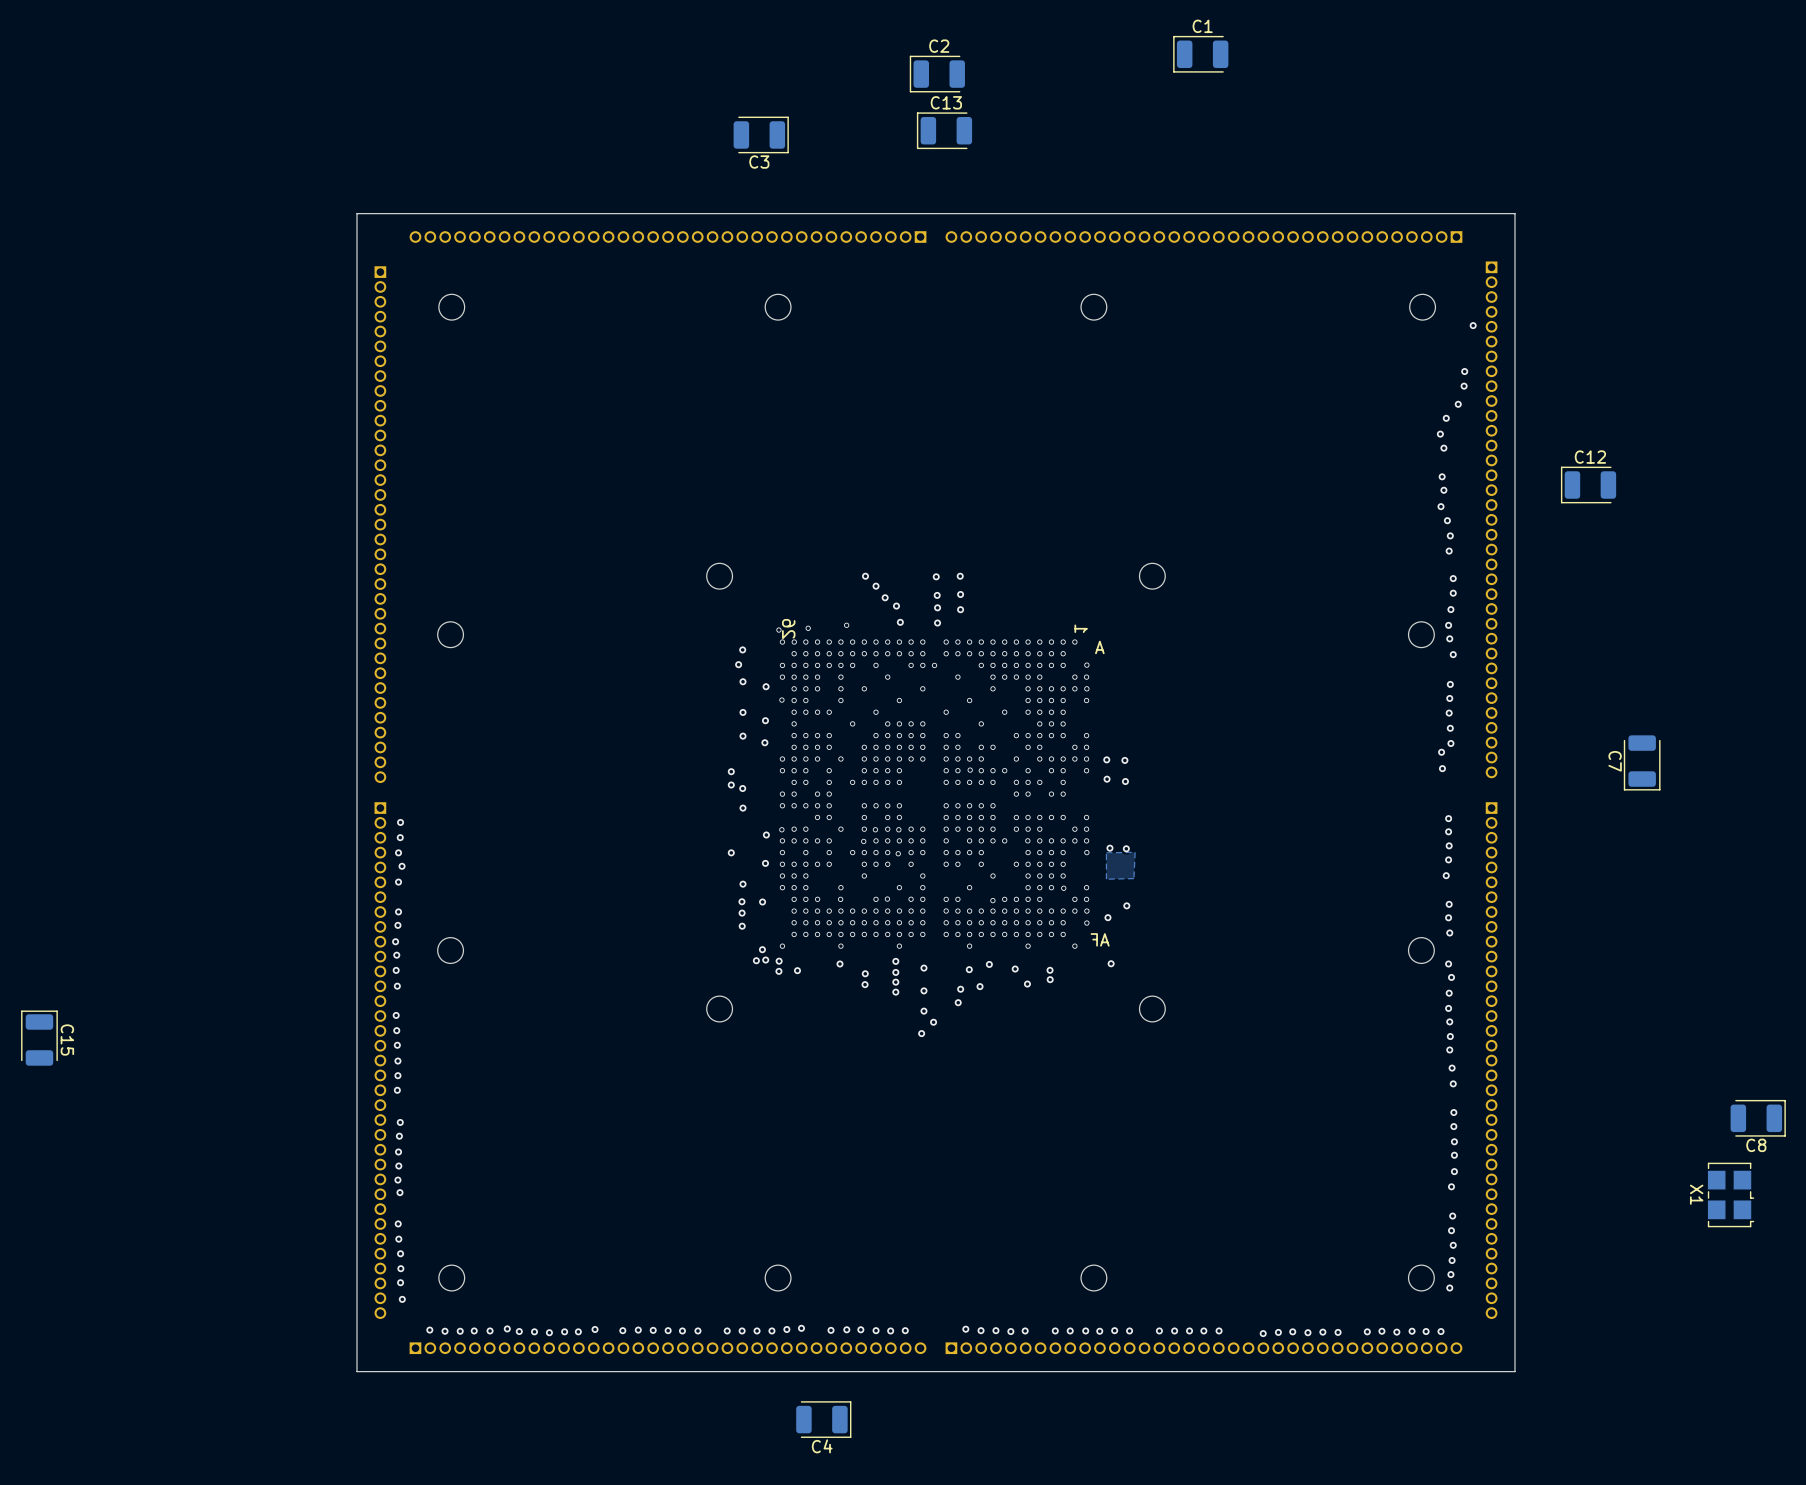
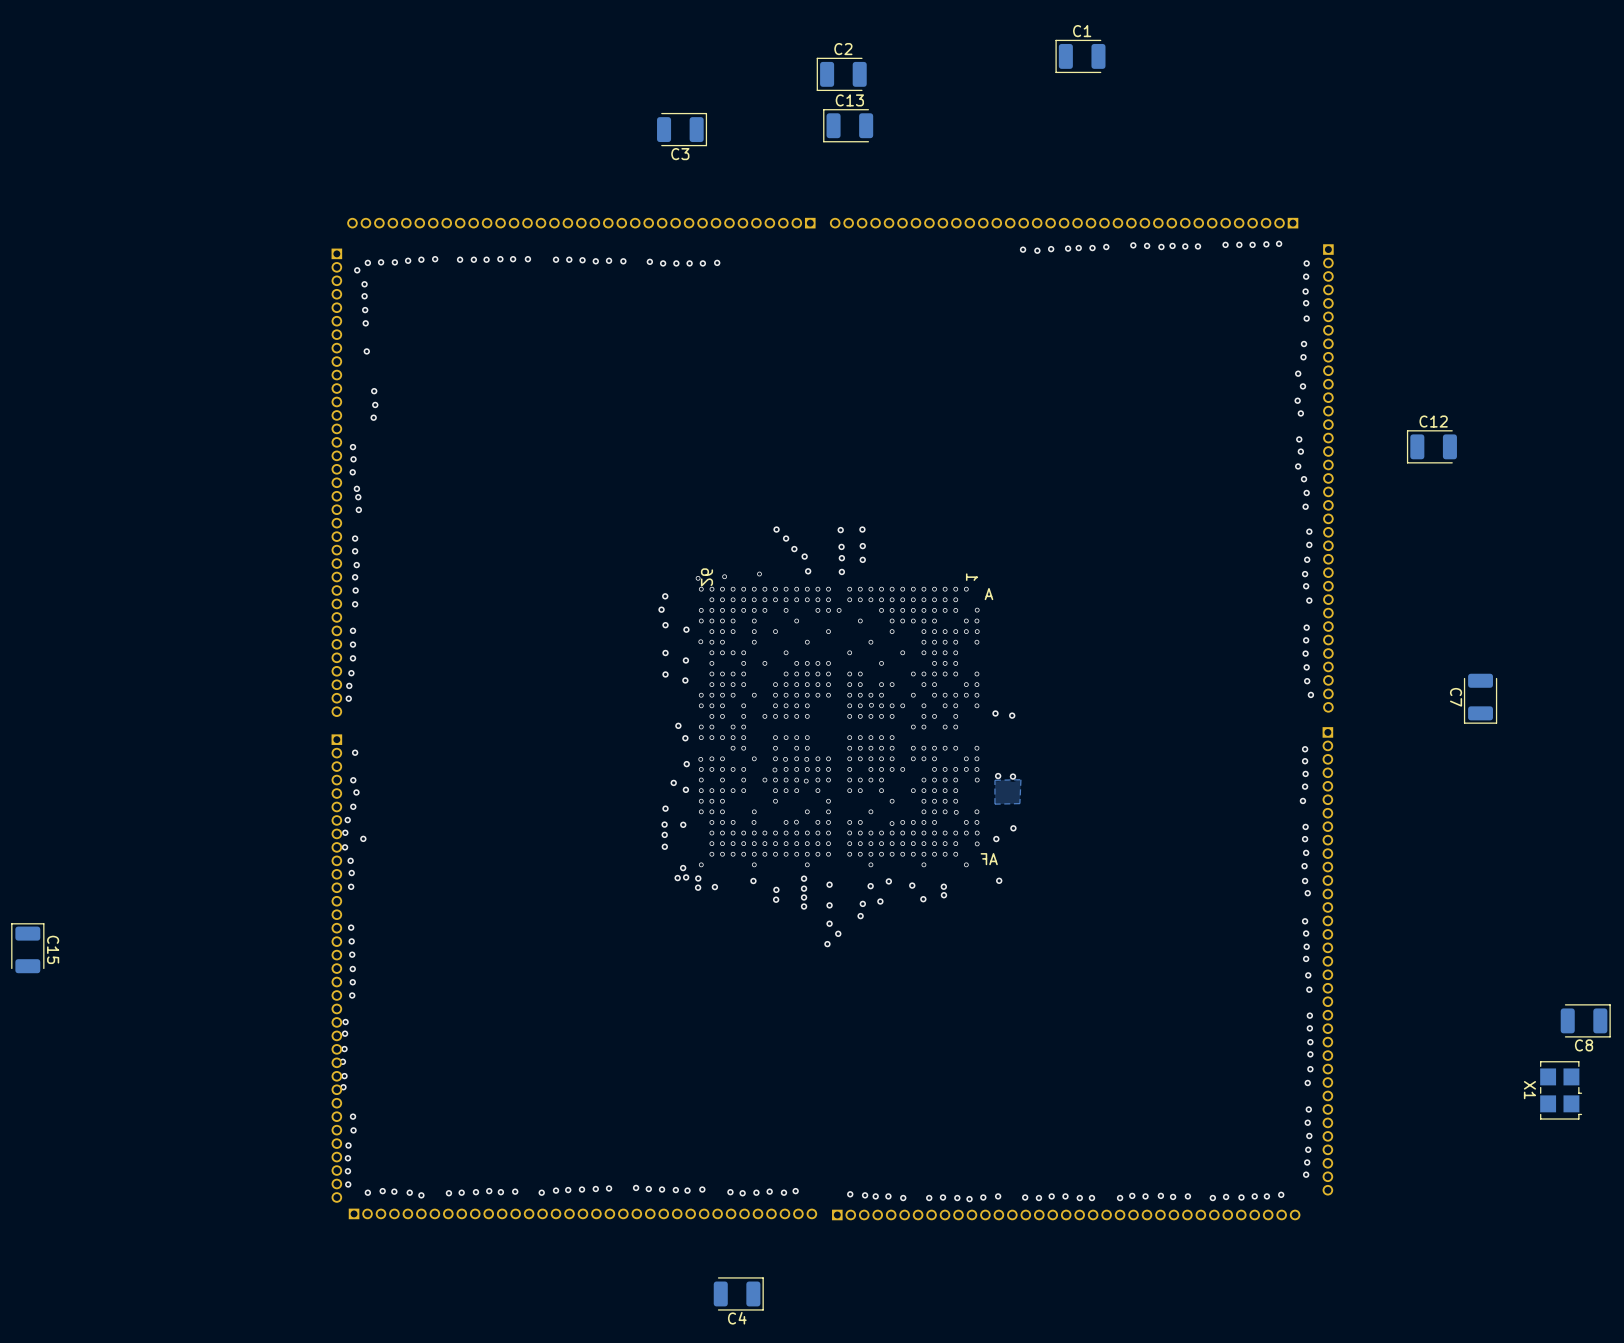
board edge: (1514, 213) (357, 213) (357, 1371) (1514, 1371) (1514, 213) -> none
part position: (668, 237) -> (581, 223)
part position: (1203, 237) -> (1064, 223)
via: none -> (1266, 244)
via: none -> (1279, 243)
via: none -> (1133, 245)
via: none -> (1225, 244)
via: none -> (1239, 244)
via: none -> (1252, 244)
via: none -> (1147, 245)
via: none -> (1172, 245)
via: none -> (1185, 246)
via: none -> (1198, 246)
via: none -> (1106, 246)
via: none -> (1161, 246)
via: none -> (1078, 248)
via: none -> (1092, 248)
via: none -> (1051, 249)
via: none -> (1068, 248)
via: none -> (1023, 249)
via: none -> (1037, 250)
via: none -> (435, 259)
via: none -> (500, 259)
via: none -> (513, 259)
via: none -> (527, 259)
via: none -> (421, 259)
via: none -> (460, 259)
via: none -> (473, 259)
via: none -> (486, 259)
via: none -> (556, 259)
via: none -> (569, 259)
via: none -> (408, 260)
via: none -> (582, 260)
via: none -> (609, 260)
via: none -> (595, 261)
via: none -> (623, 261)
via: none -> (649, 261)
via: none -> (381, 262)
via: none -> (394, 262)
via: none -> (367, 262)
via: none -> (663, 263)
via: none -> (676, 263)
via: none -> (689, 263)
via: none -> (702, 263)
via: none -> (717, 262)
via: none -> (1306, 263)
via: none -> (357, 270)
round board edge: [438, 294, 465, 321] -> none
round board edge: [764, 294, 792, 321] -> none
round board edge: [1080, 294, 1108, 321] -> none
round board edge: [1409, 294, 1436, 321] -> none
via: none -> (1306, 276)
via: none -> (364, 284)
via: none -> (1305, 291)
via: none -> (364, 296)
via: (1473, 325) -> none
via: none -> (1306, 303)
via: none -> (365, 310)
via: none -> (1306, 318)
via: none -> (365, 323)
via: none -> (1304, 344)
via: (1464, 371) -> none
via: none -> (366, 351)
via: none -> (1303, 357)
via: (1464, 386) -> none
via: none -> (1298, 373)
via: (1458, 404) -> none
via: none -> (374, 391)
via: none -> (375, 404)
via: none -> (373, 417)
via: none -> (353, 447)
via: none -> (353, 459)
via: none -> (352, 472)
part position: (1491, 519) -> (1328, 478)
via: none -> (356, 488)
via: none -> (358, 497)
via: none -> (358, 509)
round board edge: [706, 563, 733, 590] -> none
round board edge: [1139, 563, 1166, 590] -> none
via: none -> (355, 538)
via: none -> (355, 551)
via: none -> (356, 565)
round board edge: [437, 621, 464, 648] -> none
round board edge: [1408, 621, 1435, 648] -> none
via: none -> (355, 577)
via: none -> (355, 590)
via: none -> (355, 604)
via: none -> (353, 630)
via: none -> (353, 644)
via: none -> (353, 658)
via: none -> (743, 663)
via: none -> (351, 673)
via: none -> (349, 685)
via: (1441, 752) -> none
via: none -> (1310, 694)
via: (1106, 759) -> none
via: (1124, 760) -> none
via: none -> (348, 698)
via: (1442, 768) -> none
via: (731, 771) -> none
via: (1016, 782) -> none
via: (731, 785) -> none
via: (742, 788) -> none
via: none -> (678, 725)
via: none -> (685, 738)
via: (742, 808) -> none
via: (400, 837) -> none
via: (1027, 840) -> none
via position: (731, 852) -> (673, 782)
via: none -> (347, 820)
via: none -> (345, 832)
via: (398, 911) -> none
via: none -> (363, 838)
via: (397, 925) -> none
via: none -> (345, 847)
round board edge: [437, 937, 464, 964] -> none
round board edge: [1408, 937, 1435, 964] -> none
via: (397, 986) -> none
via position: (1449, 993) -> (1304, 866)
round board edge: [706, 995, 733, 1023] -> none
round board edge: [1139, 995, 1166, 1023] -> none
part position: (1491, 1060) -> (1327, 961)
via: none -> (345, 1022)
via: (400, 1122) -> none
via: none -> (345, 1033)
via: (399, 1136) -> none
via: none -> (344, 1049)
via: (398, 1151) -> none
via: none -> (342, 1061)
via: (398, 1166) -> none
via: none -> (344, 1076)
via: (397, 1180) -> none
via: none -> (343, 1087)
via: (399, 1192) -> none
via: (400, 1253) -> none
via: none -> (348, 1145)
round board edge: [438, 1264, 465, 1292] -> none
round board edge: [764, 1264, 792, 1292] -> none
round board edge: [1080, 1264, 1108, 1292] -> none
round board edge: [1408, 1264, 1435, 1292] -> none
via: (400, 1268) -> none
via: none -> (347, 1158)
via: (400, 1282) -> none
via: none -> (347, 1171)
via: none -> (348, 1184)
via: (402, 1299) -> none
via: none -> (636, 1187)
via: none -> (595, 1189)
via: none -> (609, 1188)
via: none -> (648, 1189)
via: none -> (568, 1190)
via: none -> (582, 1189)
via: none -> (662, 1189)
via: none -> (675, 1190)
via: none -> (702, 1189)
via: none -> (556, 1190)
via: none -> (687, 1190)
via: none -> (382, 1191)
via: none -> (394, 1191)
via: none -> (489, 1191)
via: none -> (515, 1191)
via: none -> (769, 1191)
via: none -> (795, 1191)
via: none -> (367, 1192)
via: none -> (409, 1192)
via: none -> (461, 1192)
via: none -> (475, 1192)
via: none -> (500, 1192)
via: none -> (541, 1192)
via: none -> (730, 1192)
via: none -> (756, 1192)
via: none -> (783, 1192)
via: none -> (448, 1193)
via: none -> (742, 1193)
via: none -> (850, 1194)
via: none -> (421, 1195)
via: none -> (865, 1195)
via: none -> (1281, 1194)
via: none -> (875, 1196)
via: none -> (888, 1196)
via: none -> (998, 1196)
via: none -> (1051, 1196)
via: none -> (1065, 1196)
via: none -> (1132, 1195)
via: none -> (1145, 1196)
via: none -> (1160, 1195)
via: none -> (1187, 1196)
via: none -> (1254, 1196)
via: none -> (1266, 1196)
via: none -> (1173, 1196)
via: none -> (1226, 1196)
via: none -> (903, 1198)
via: none -> (929, 1198)
via: none -> (943, 1197)
via: none -> (957, 1198)
via: none -> (983, 1197)
via: none -> (1025, 1197)
via: none -> (1038, 1198)
via: none -> (1079, 1198)
via: none -> (1091, 1198)
via: none -> (1120, 1198)
via: none -> (1212, 1198)
via: none -> (1241, 1197)
via: none -> (969, 1199)
via: (507, 1328) -> none
via: (801, 1328) -> none
via: (595, 1329) -> none
via: (786, 1329) -> none
via: (846, 1329) -> none
via: (860, 1329) -> none
via: (965, 1329) -> none
via: (429, 1330) -> none
via: (474, 1330) -> none
via: (490, 1330) -> none
via: (622, 1330) -> none
via: (638, 1330) -> none
via: (653, 1330) -> none
via: (668, 1330) -> none
via: (682, 1330) -> none
via: (697, 1330) -> none
via: (727, 1330) -> none
via: (742, 1330) -> none
via: (757, 1330) -> none
via: (771, 1330) -> none
via: (831, 1330) -> none
via: (876, 1330) -> none
via: (890, 1330) -> none
via: (905, 1330) -> none
via: (981, 1330) -> none
via: (995, 1330) -> none
via: (1025, 1330) -> none
via: (1055, 1330) -> none
via: (1070, 1330) -> none
via: (1085, 1330) -> none
via: (1114, 1330) -> none
via: (1129, 1330) -> none
via: (1159, 1330) -> none
via: (1174, 1330) -> none
via: (1189, 1330) -> none
via: (1203, 1330) -> none
via: (1219, 1330) -> none
via: (445, 1331) -> none
via: (460, 1331) -> none
via: (519, 1331) -> none
via: (534, 1331) -> none
via: (564, 1331) -> none
via: (578, 1331) -> none
via: (1010, 1331) -> none
via: (1099, 1331) -> none
via: (1292, 1331) -> none
via: (1367, 1331) -> none
via: (1381, 1331) -> none
via: (1412, 1331) -> none
via: (1426, 1331) -> none
via: (1441, 1331) -> none
via: (549, 1332) -> none
via: (1278, 1332) -> none
via: (1307, 1332) -> none
via: (1322, 1332) -> none
via: (1338, 1332) -> none
via: (1396, 1332) -> none
via: (1263, 1333) -> none
part position: (668, 1348) -> (582, 1213)
part position: (1203, 1348) -> (1066, 1214)

